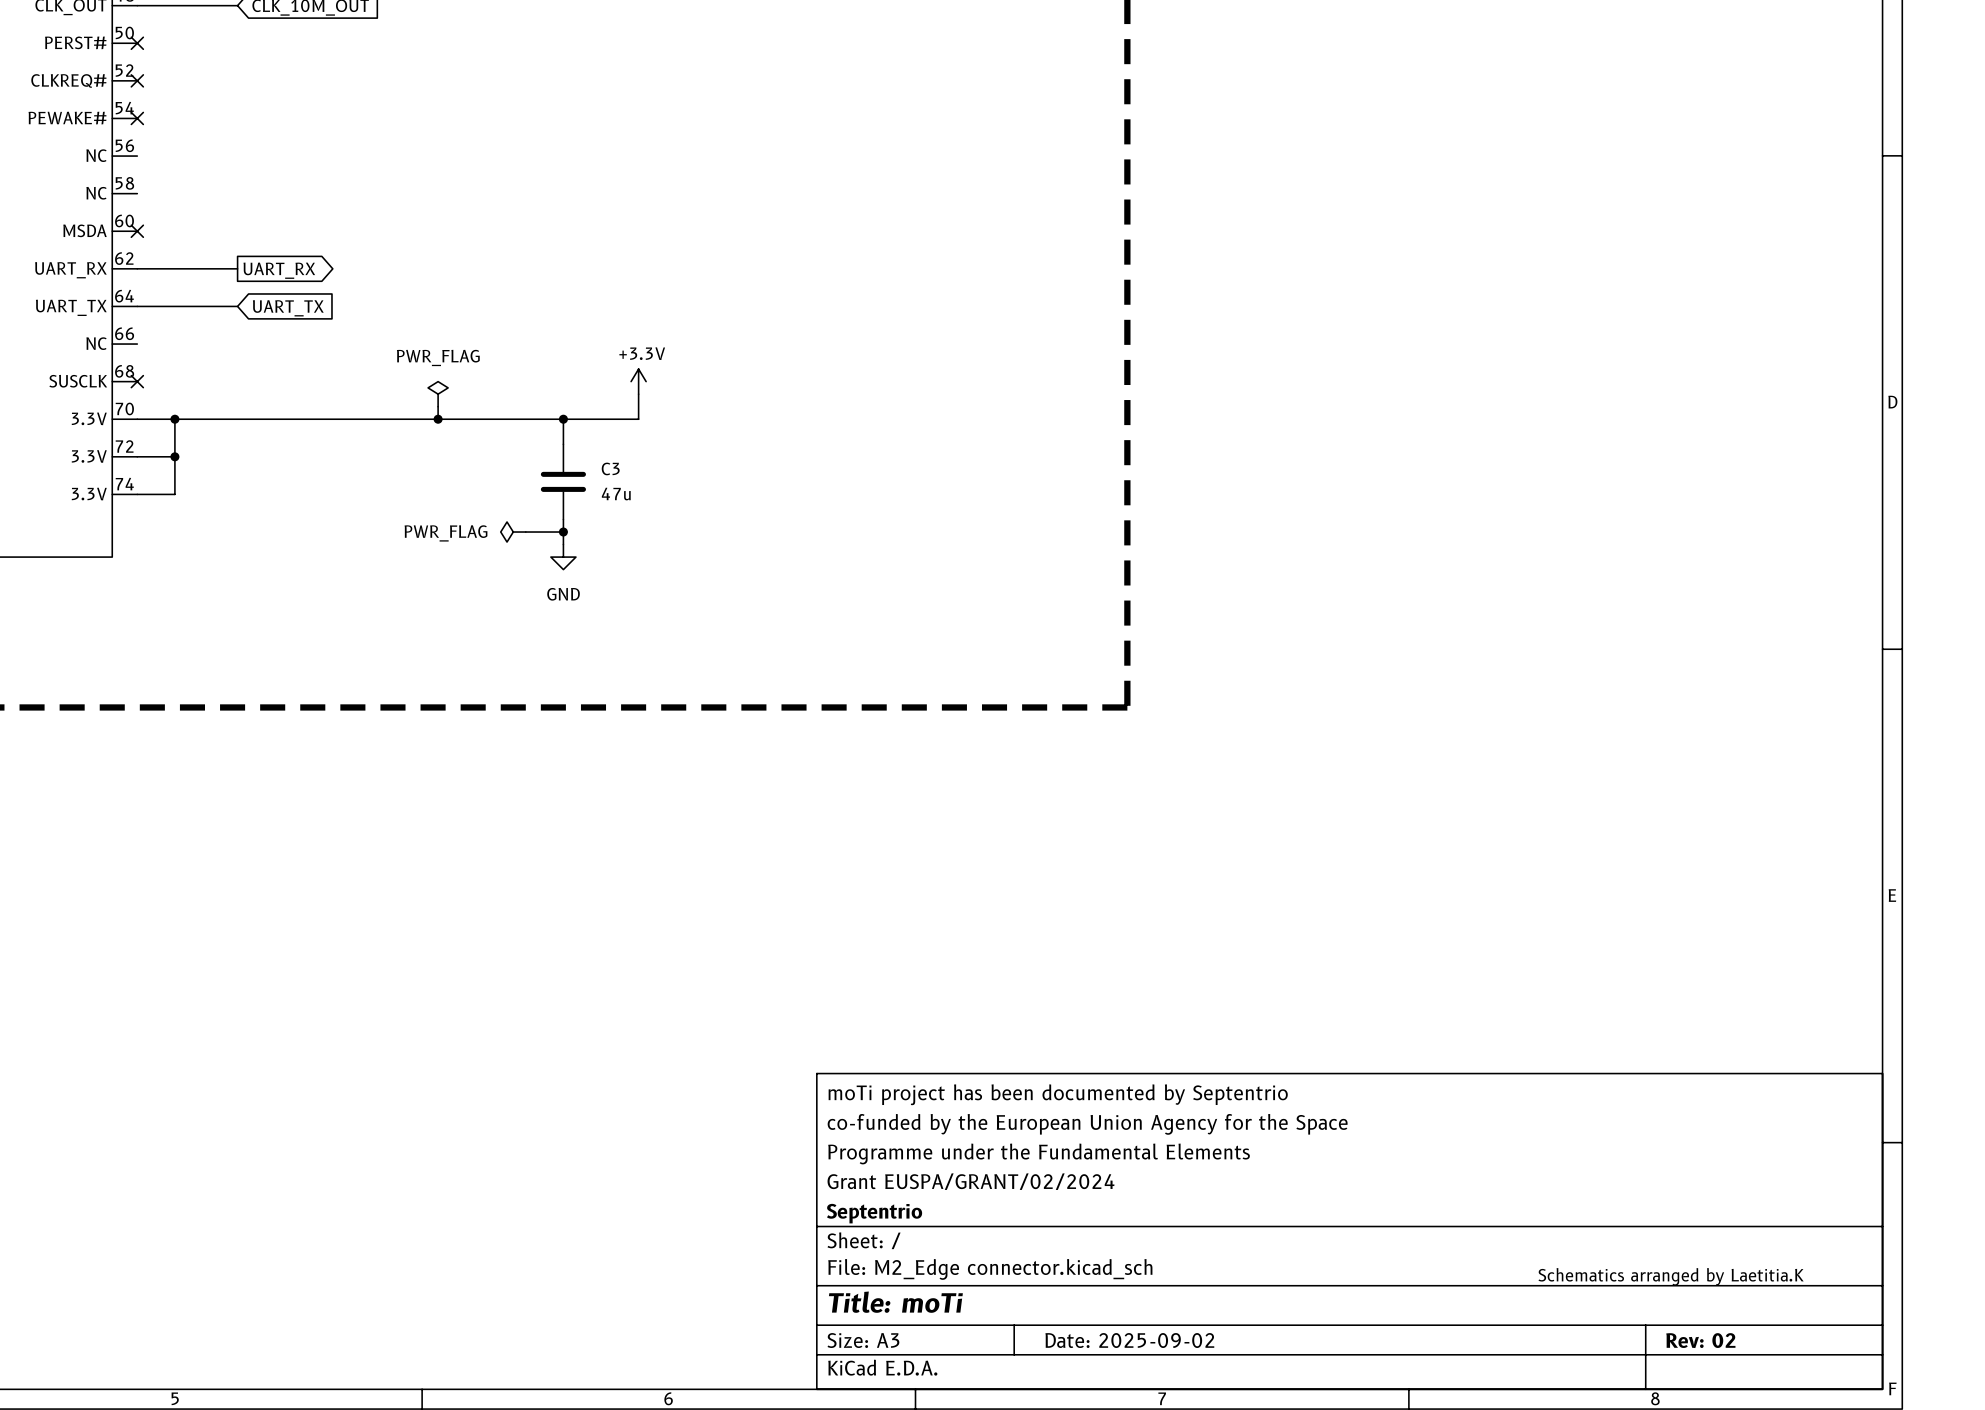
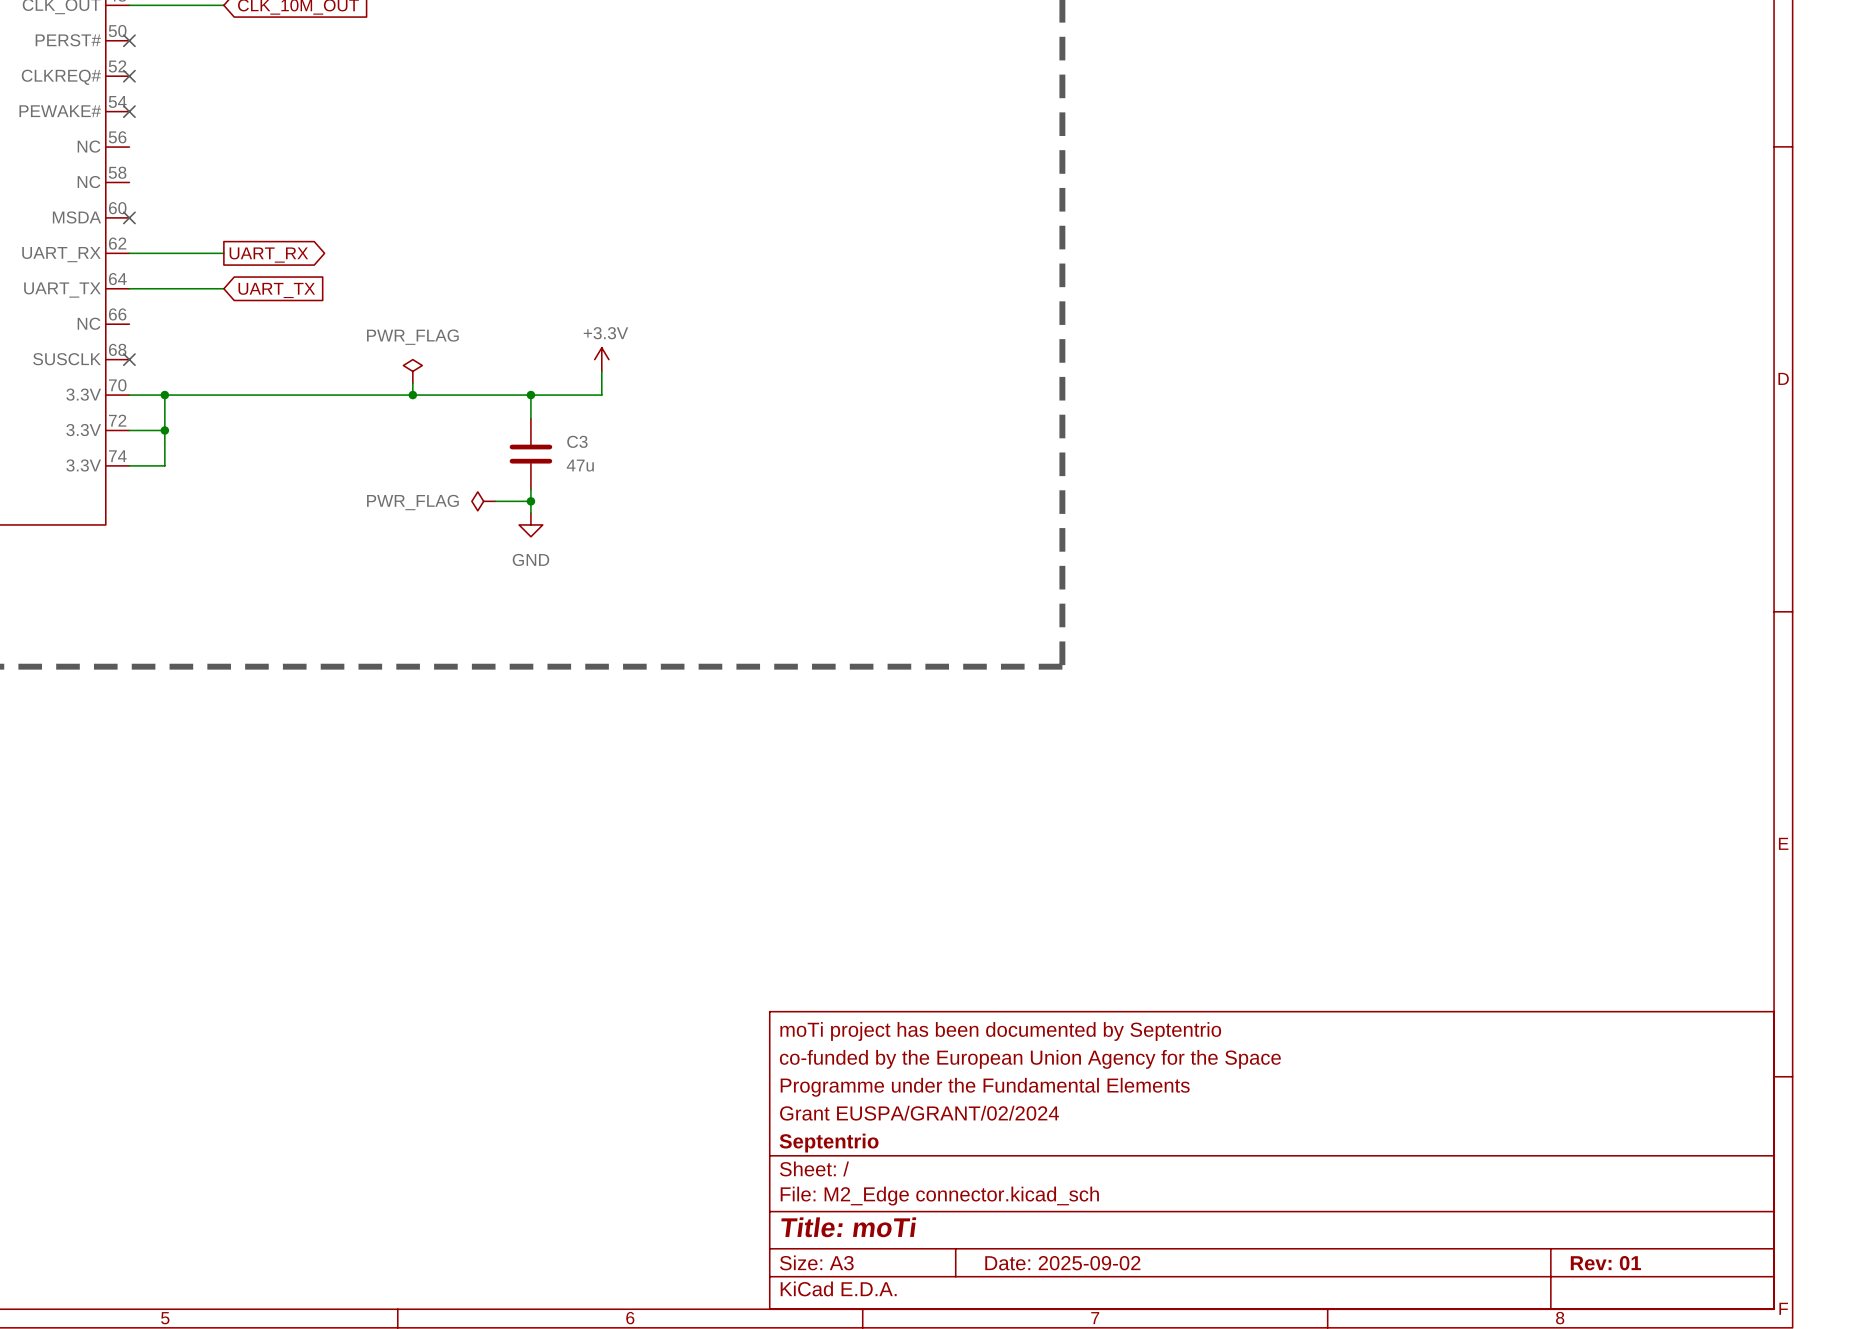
text: Schematics arranged by Laetitia.K (1671, 1276) -> none
title block: Rev: 02 (1700, 1340) -> Rev: 01 (1605, 1263)

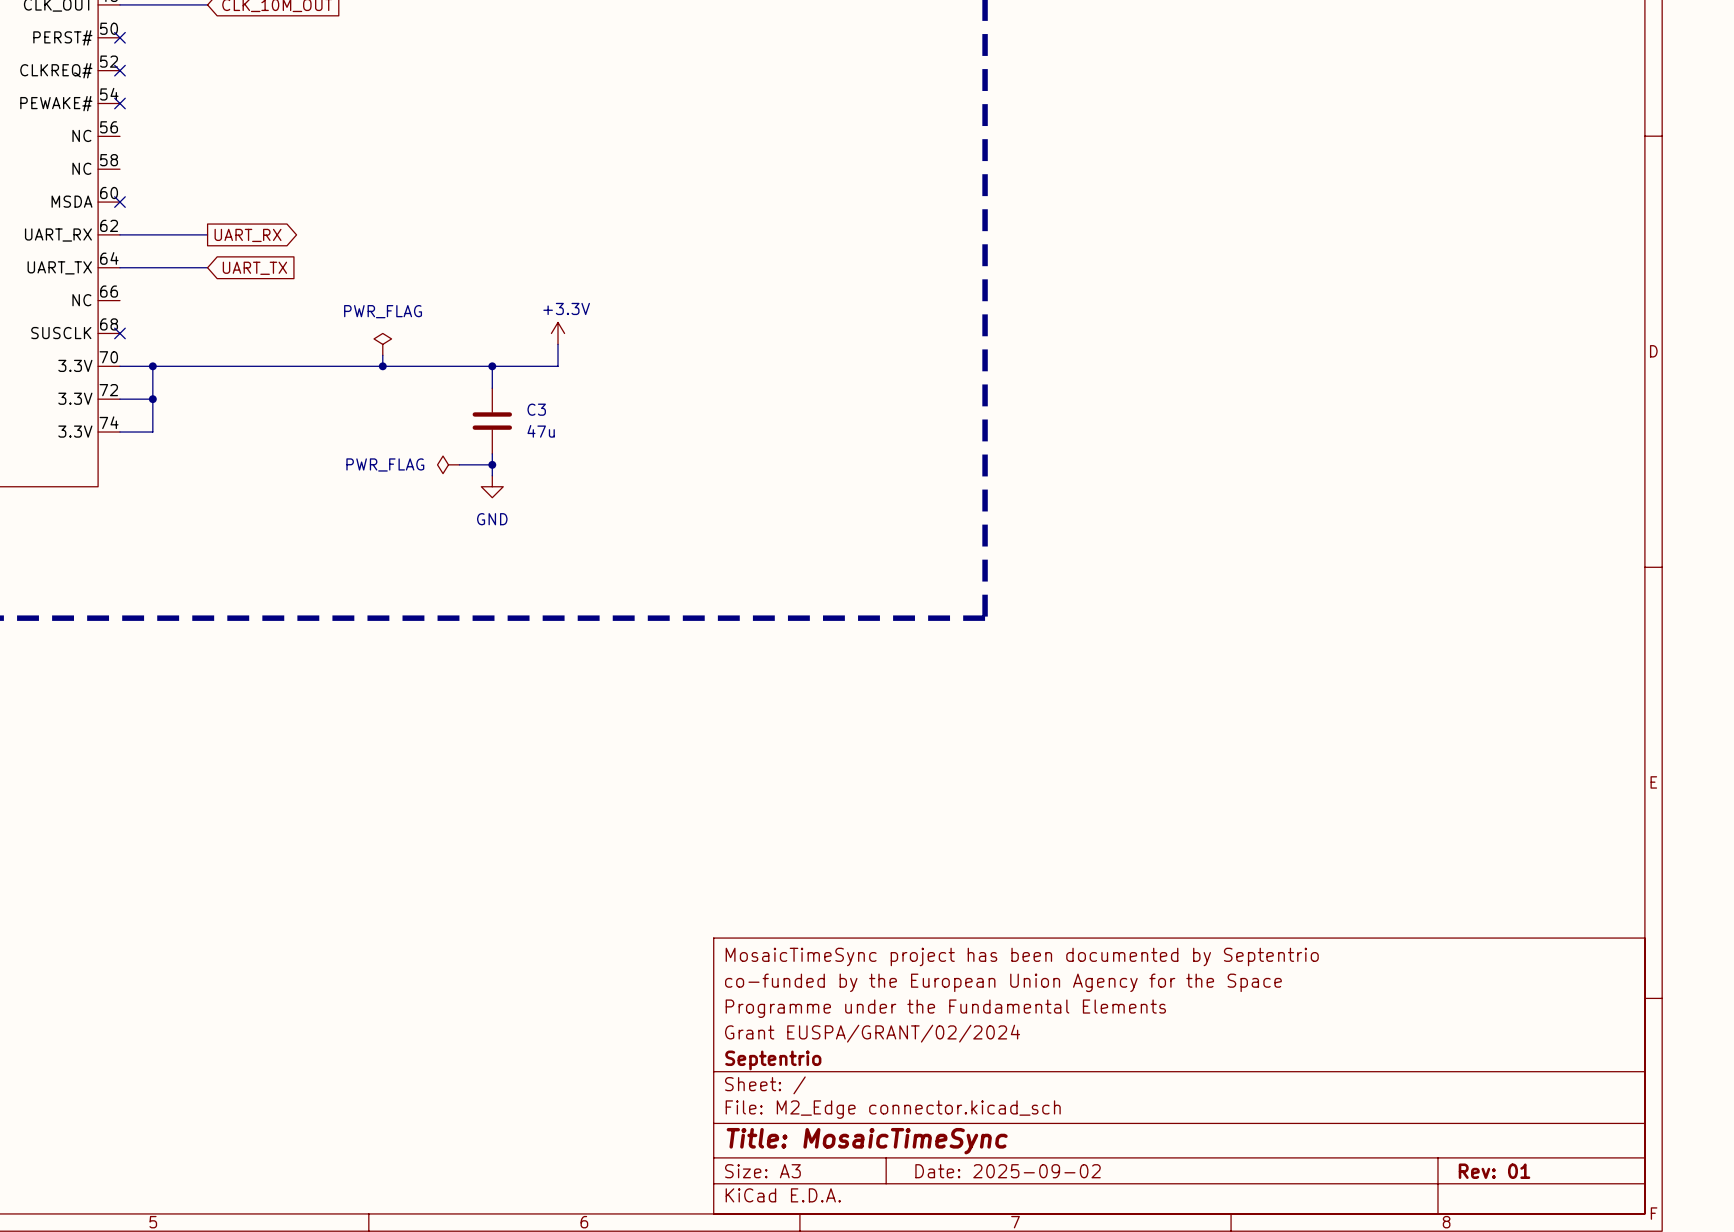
title block: moTi project has been documented by Septentrio (1000, 1031) -> MosaicTimeSync project has been documented by Septentrio (1022, 956)
title block: Title: moTi (848, 1227) -> Title: MosaicTimeSync (867, 1141)

